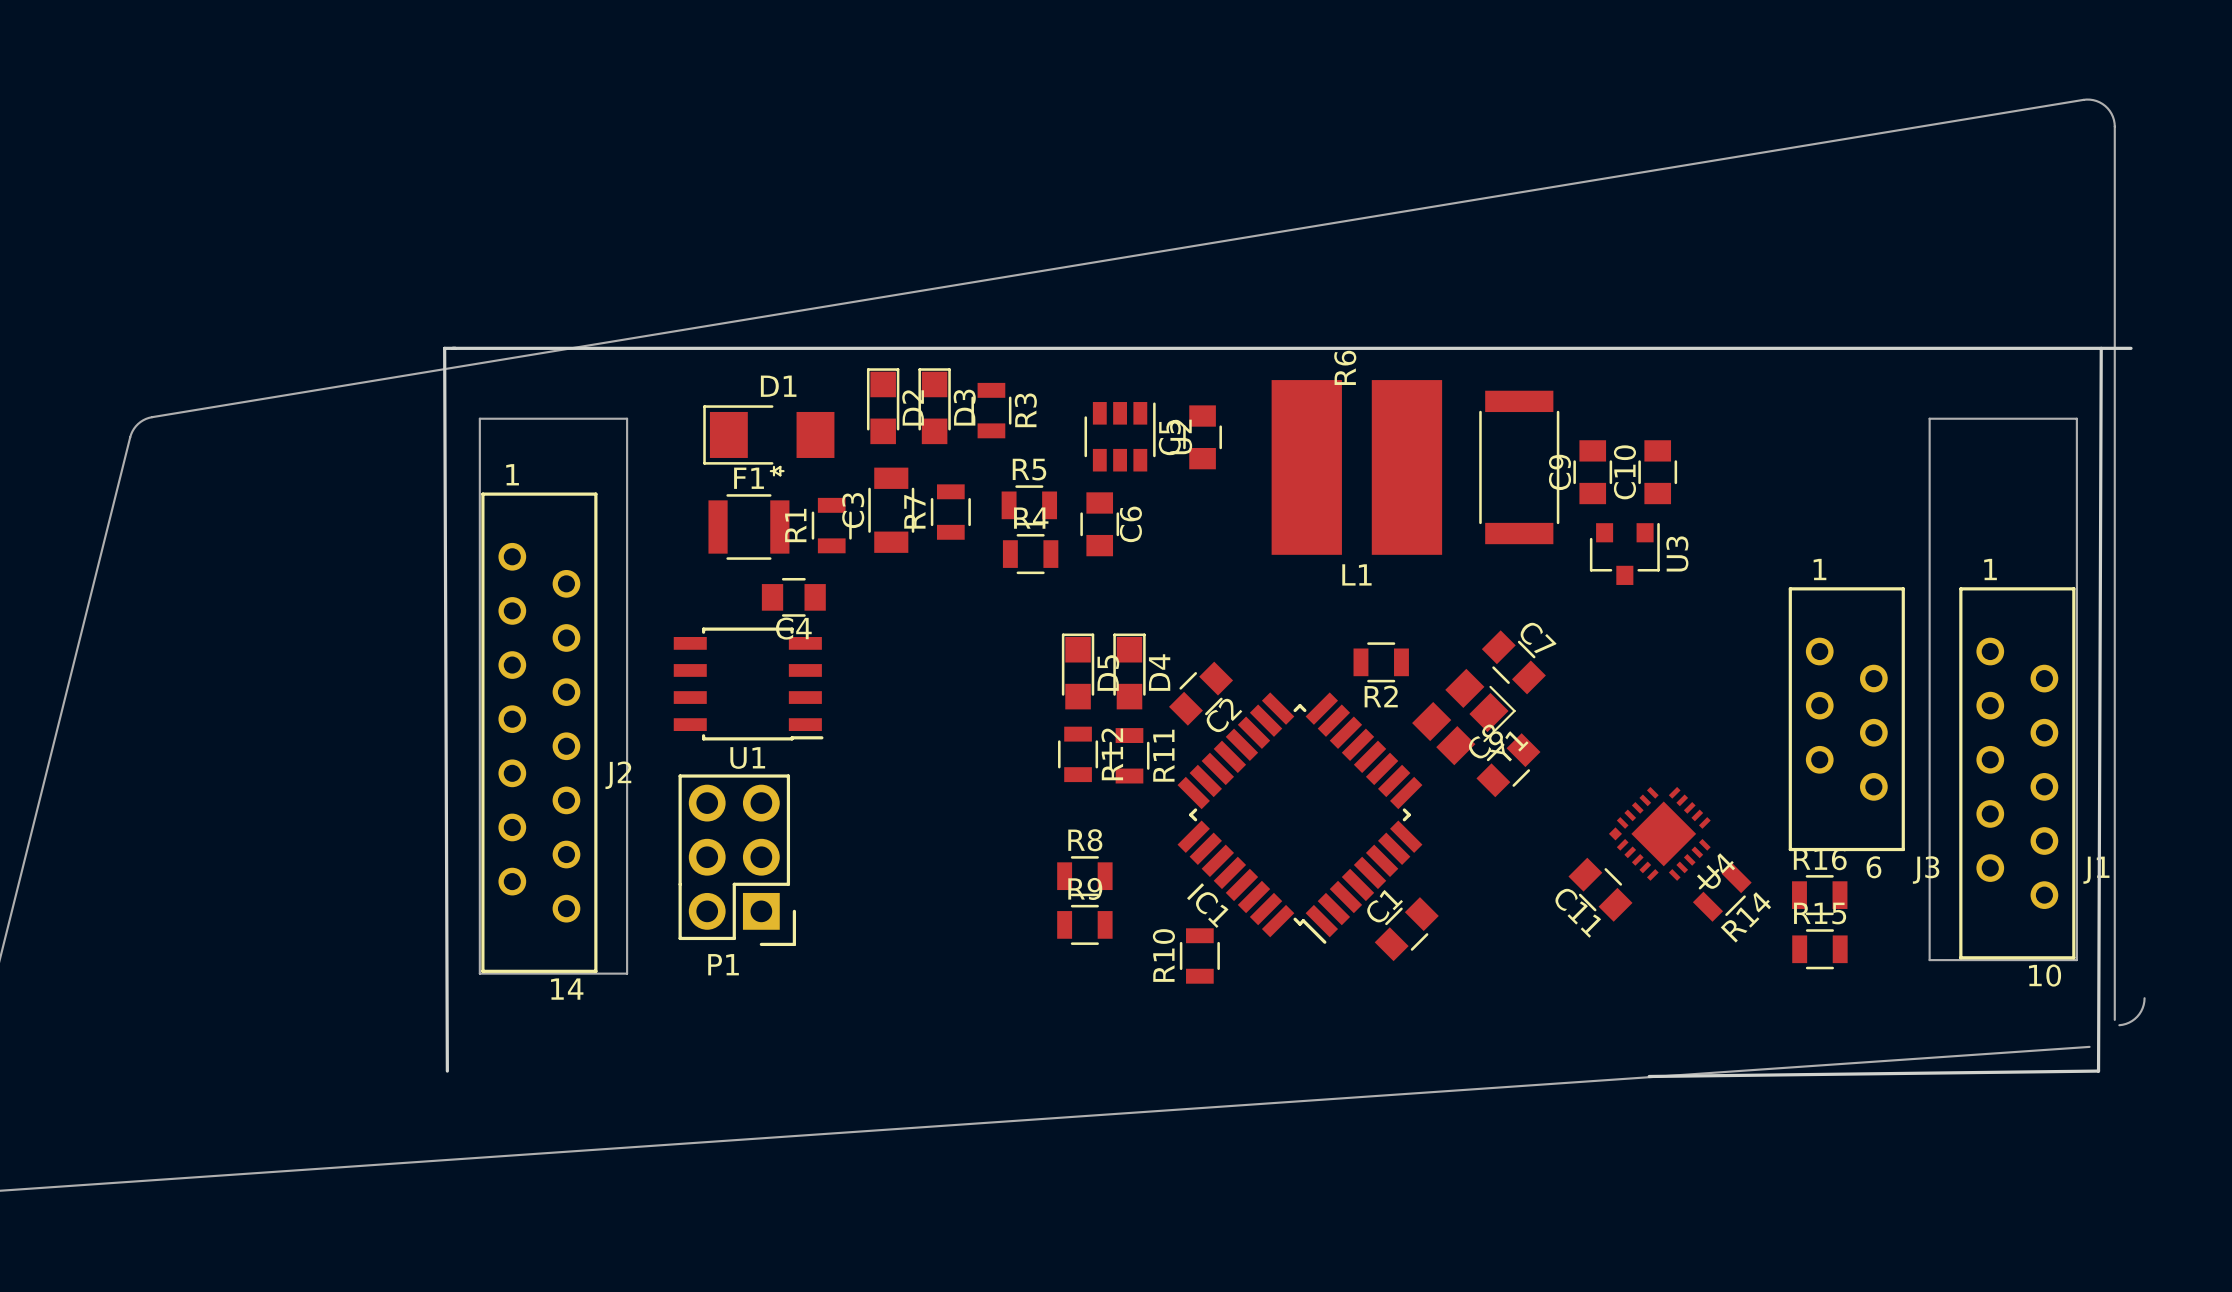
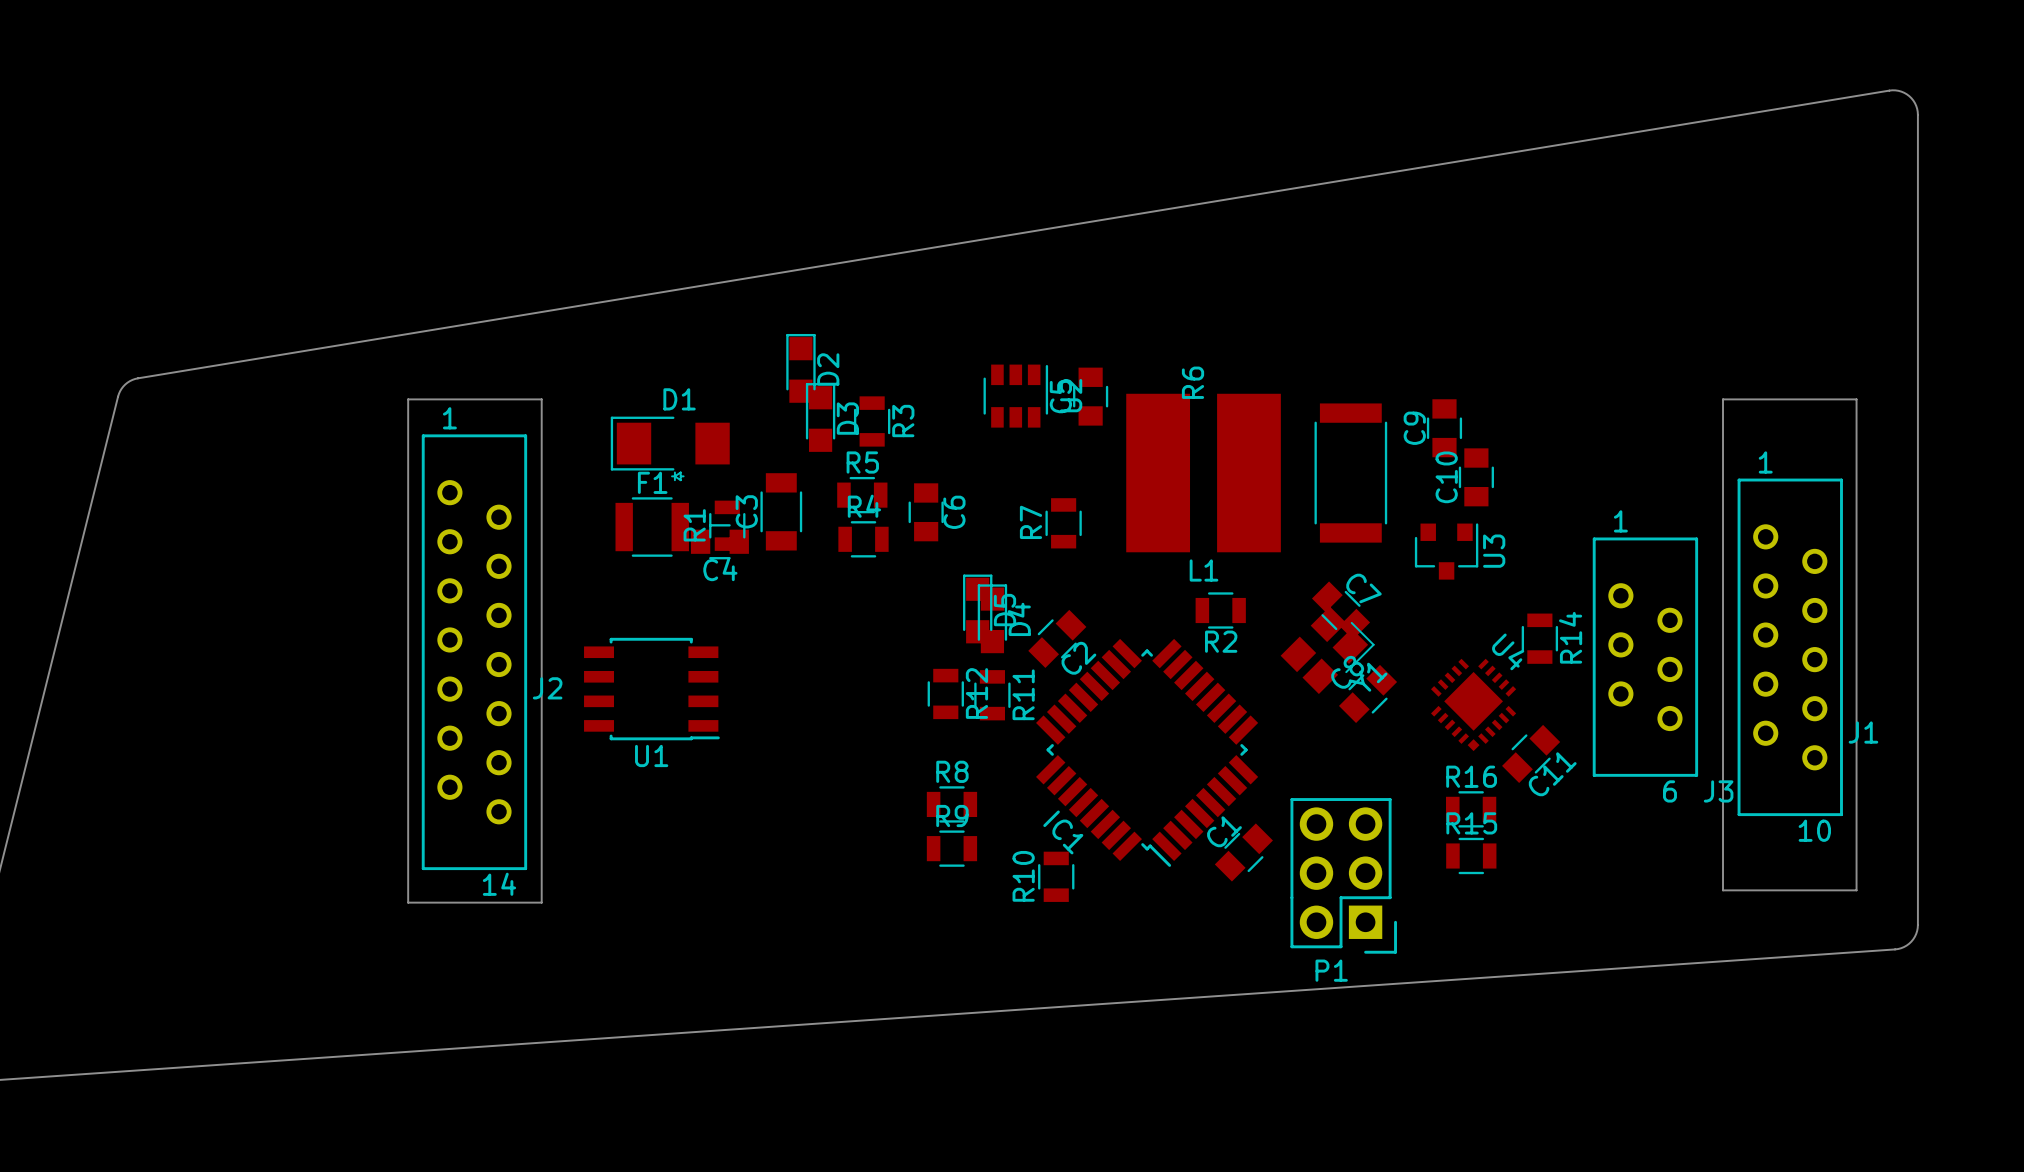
board edge: (2101, 348) (2098, 1071) (1649, 1076) -> none
board edge: (2131, 348) (444, 348) (447, 1071) -> none
D3 position: (934, 406) -> (820, 417)
R3 position: (991, 410) -> (872, 421)
line: (479, 418) (627, 418) (627, 973) (479, 973) (479, 418) -> (408, 399) (541, 399) (541, 902) (408, 902) (408, 399)
line: (1929, 418) (1929, 960) (2076, 960) (2076, 418) (1929, 418) -> (1723, 399) (1723, 890) (1856, 890) (1856, 399) (1723, 399)
D1 position: (768, 440) -> (670, 448)
L1 position: (1356, 467) -> (1203, 473)
R6 position: (1519, 467) -> (1350, 473)
C10 position: (1657, 472) -> (1476, 477)
R5 position: (1029, 505) -> (862, 495)
C3 position: (891, 510) -> (781, 511)
R7 position: (950, 512) -> (1063, 523)
C6 position: (1099, 524) -> (926, 512)
R1 position: (831, 525) -> (727, 525)
F1 position: (748, 527) -> (652, 527)
U3 position: (1624, 553) -> (1446, 551)
R4 position: (1030, 554) -> (863, 539)
R2 position: (1381, 662) -> (1220, 610)
C7 position: (1513, 662) -> (1341, 610)
D4 position: (1129, 671) -> (992, 618)
U1 position: (748, 684) -> (651, 689)
C2 position: (1201, 693) -> (1057, 638)
J3 position: (1846, 719) -> (1645, 657)
J2 position: (539, 732) -> (474, 652)
R12 position: (1078, 754) -> (945, 693)
R11 position: (1129, 755) -> (992, 695)
J1 position: (2017, 773) -> (1790, 647)
IC1 position: (1299, 818) -> (1147, 752)
U4 rotation: 0° (1659, 833) -> 90° counterclockwise (1473, 704)
U4 position: (1659, 833) -> (1473, 704)
P1 position: (737, 860) -> (1343, 875)
R8 position: (1084, 876) -> (951, 804)
C11 rotation: 0° (1600, 889) -> 90° clockwise (1531, 753)
C11 position: (1600, 889) -> (1531, 753)
R14 rotation: 0° (1722, 892) -> 45° counterclockwise (1539, 638)
R14 position: (1722, 892) -> (1539, 638)
R16 position: (1819, 895) -> (1471, 809)
C11 name position: C11 (1578, 913) -> C11 (1552, 774)
R9 position: (1084, 924) -> (951, 848)
C1 position: (1406, 929) -> (1243, 852)
R15 position: (1819, 949) -> (1471, 855)
R10 position: (1199, 955) -> (1056, 876)
line: (2144, 998) (2142, 1008) (2137, 1016) (2129, 1022) (2119, 1025) -> (1917, 924) (1916, 933) (1911, 941) (1903, 947) (1895, 949)

